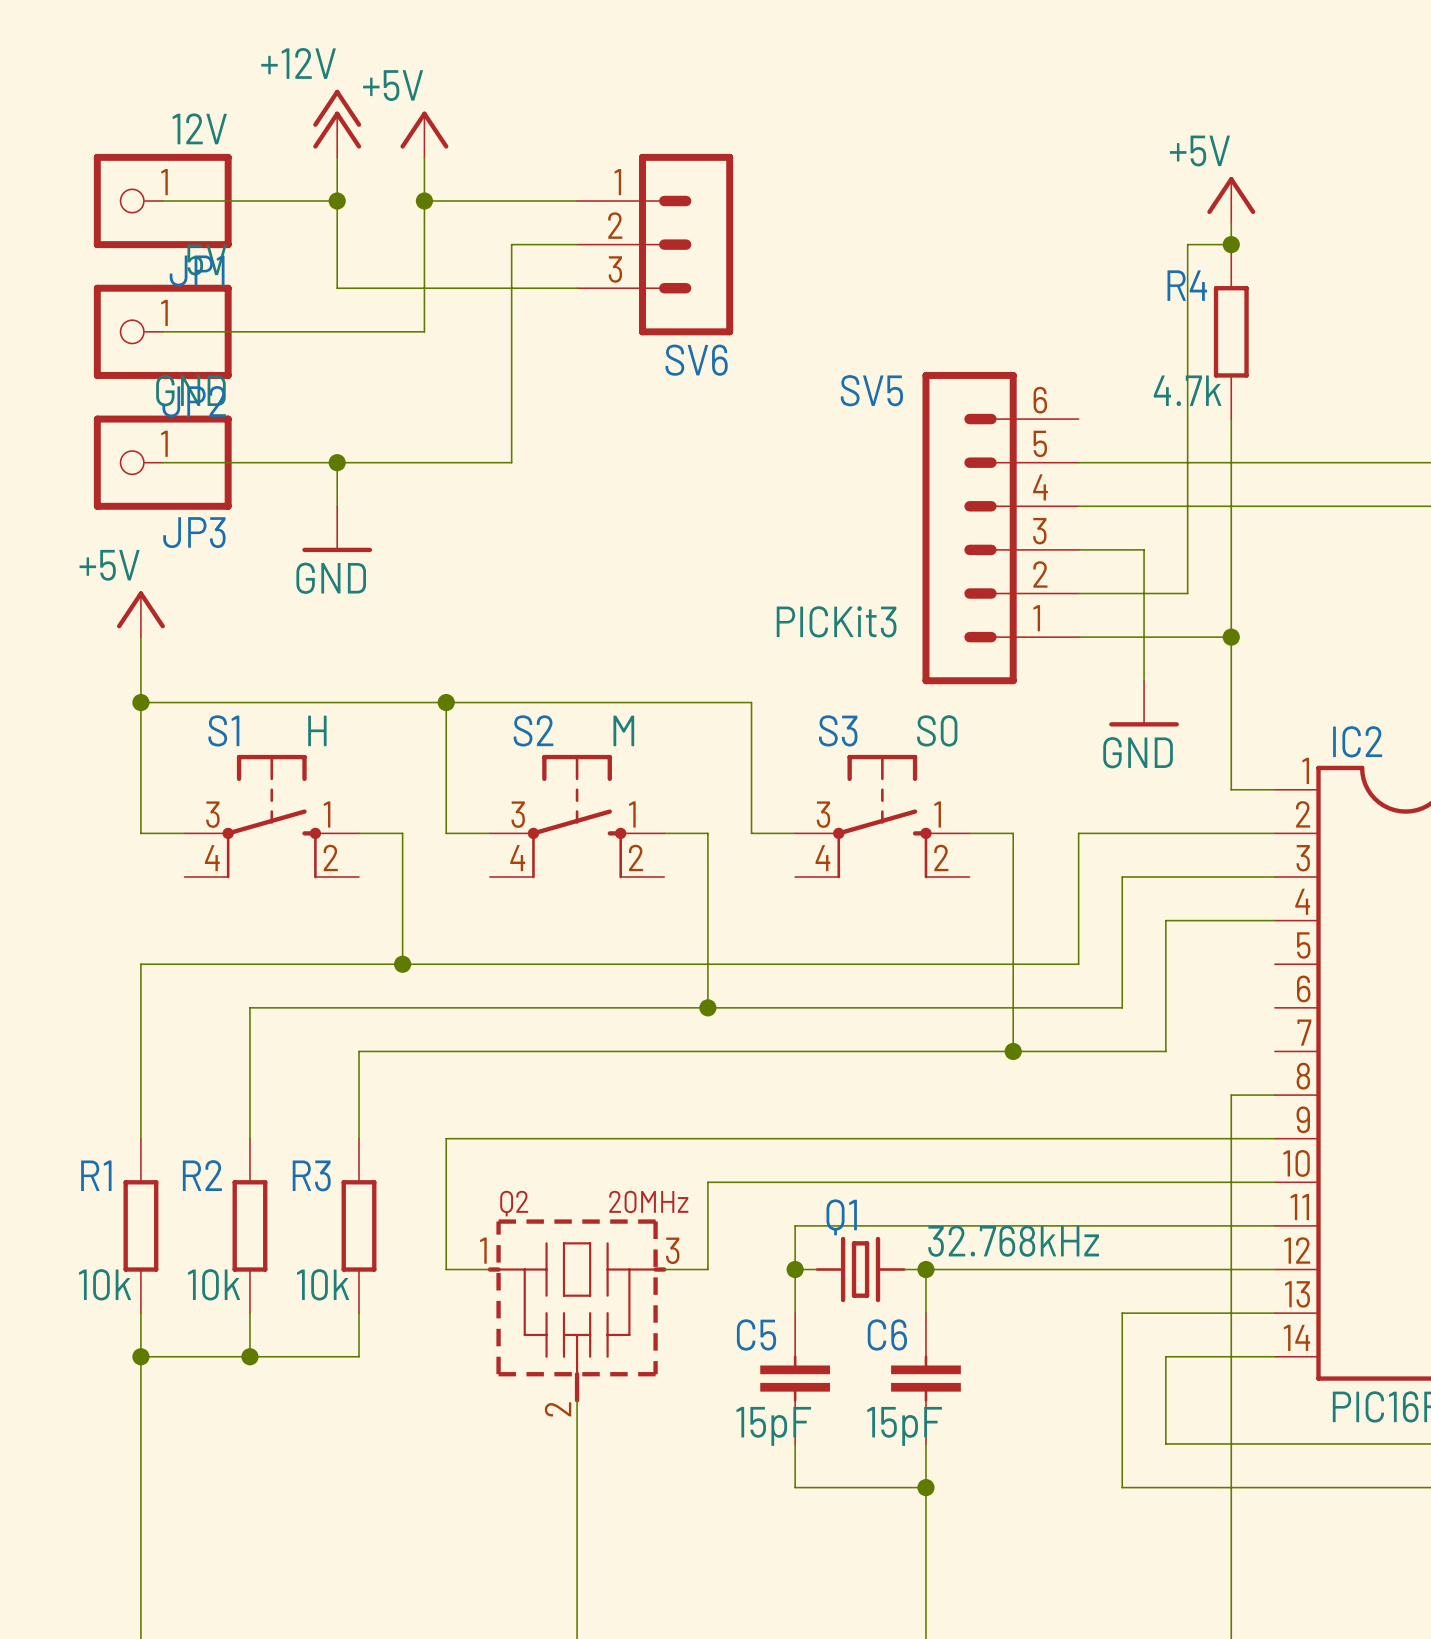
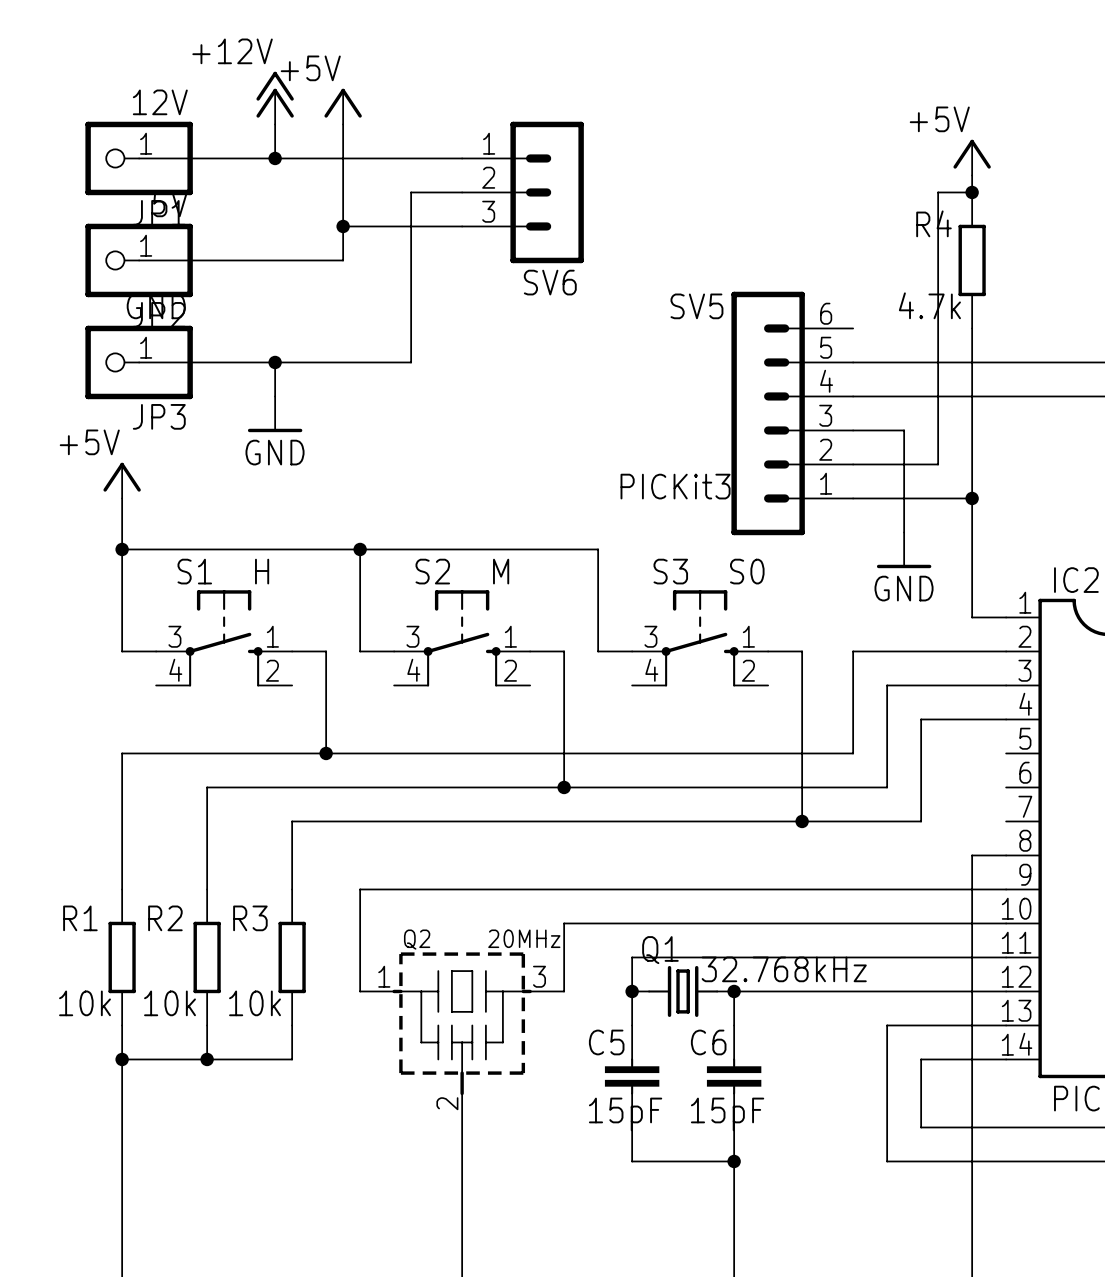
wire: (337, 201) (337, 288) (424, 288) -> (275, 158) (343, 158)
junction position: (424, 201) -> (343, 226)

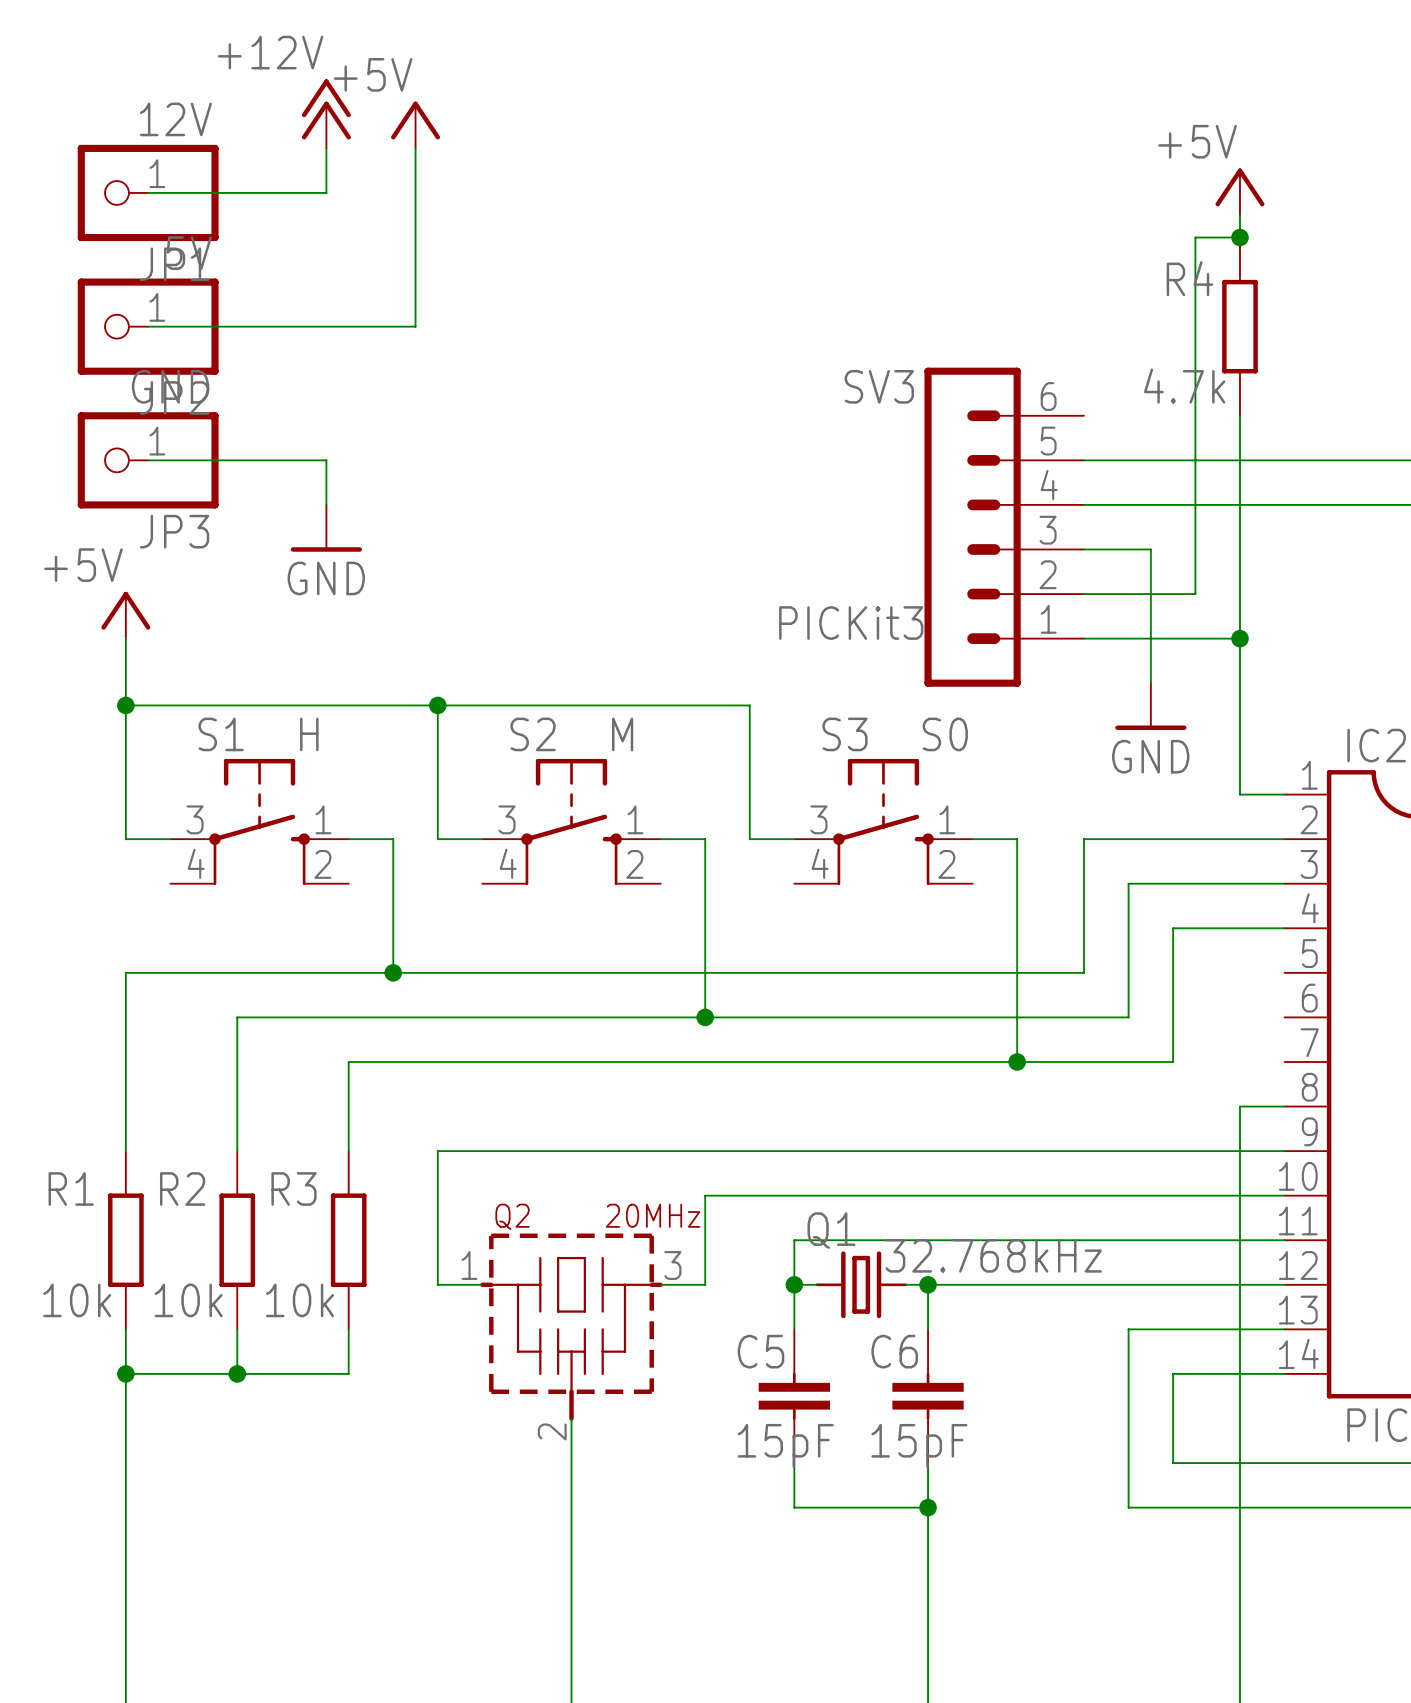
wire: (275, 158) (462, 158) -> none
junction: (275, 158) -> none
wire: (462, 192) (411, 192) (411, 362) (275, 362) -> none
SV6: (522, 192) -> none
wire: (343, 226) (462, 226) -> none
junction: (343, 226) -> none
SV5 name: SV5 (696, 306) -> SV3 (879, 386)
junction: (275, 362) -> none

